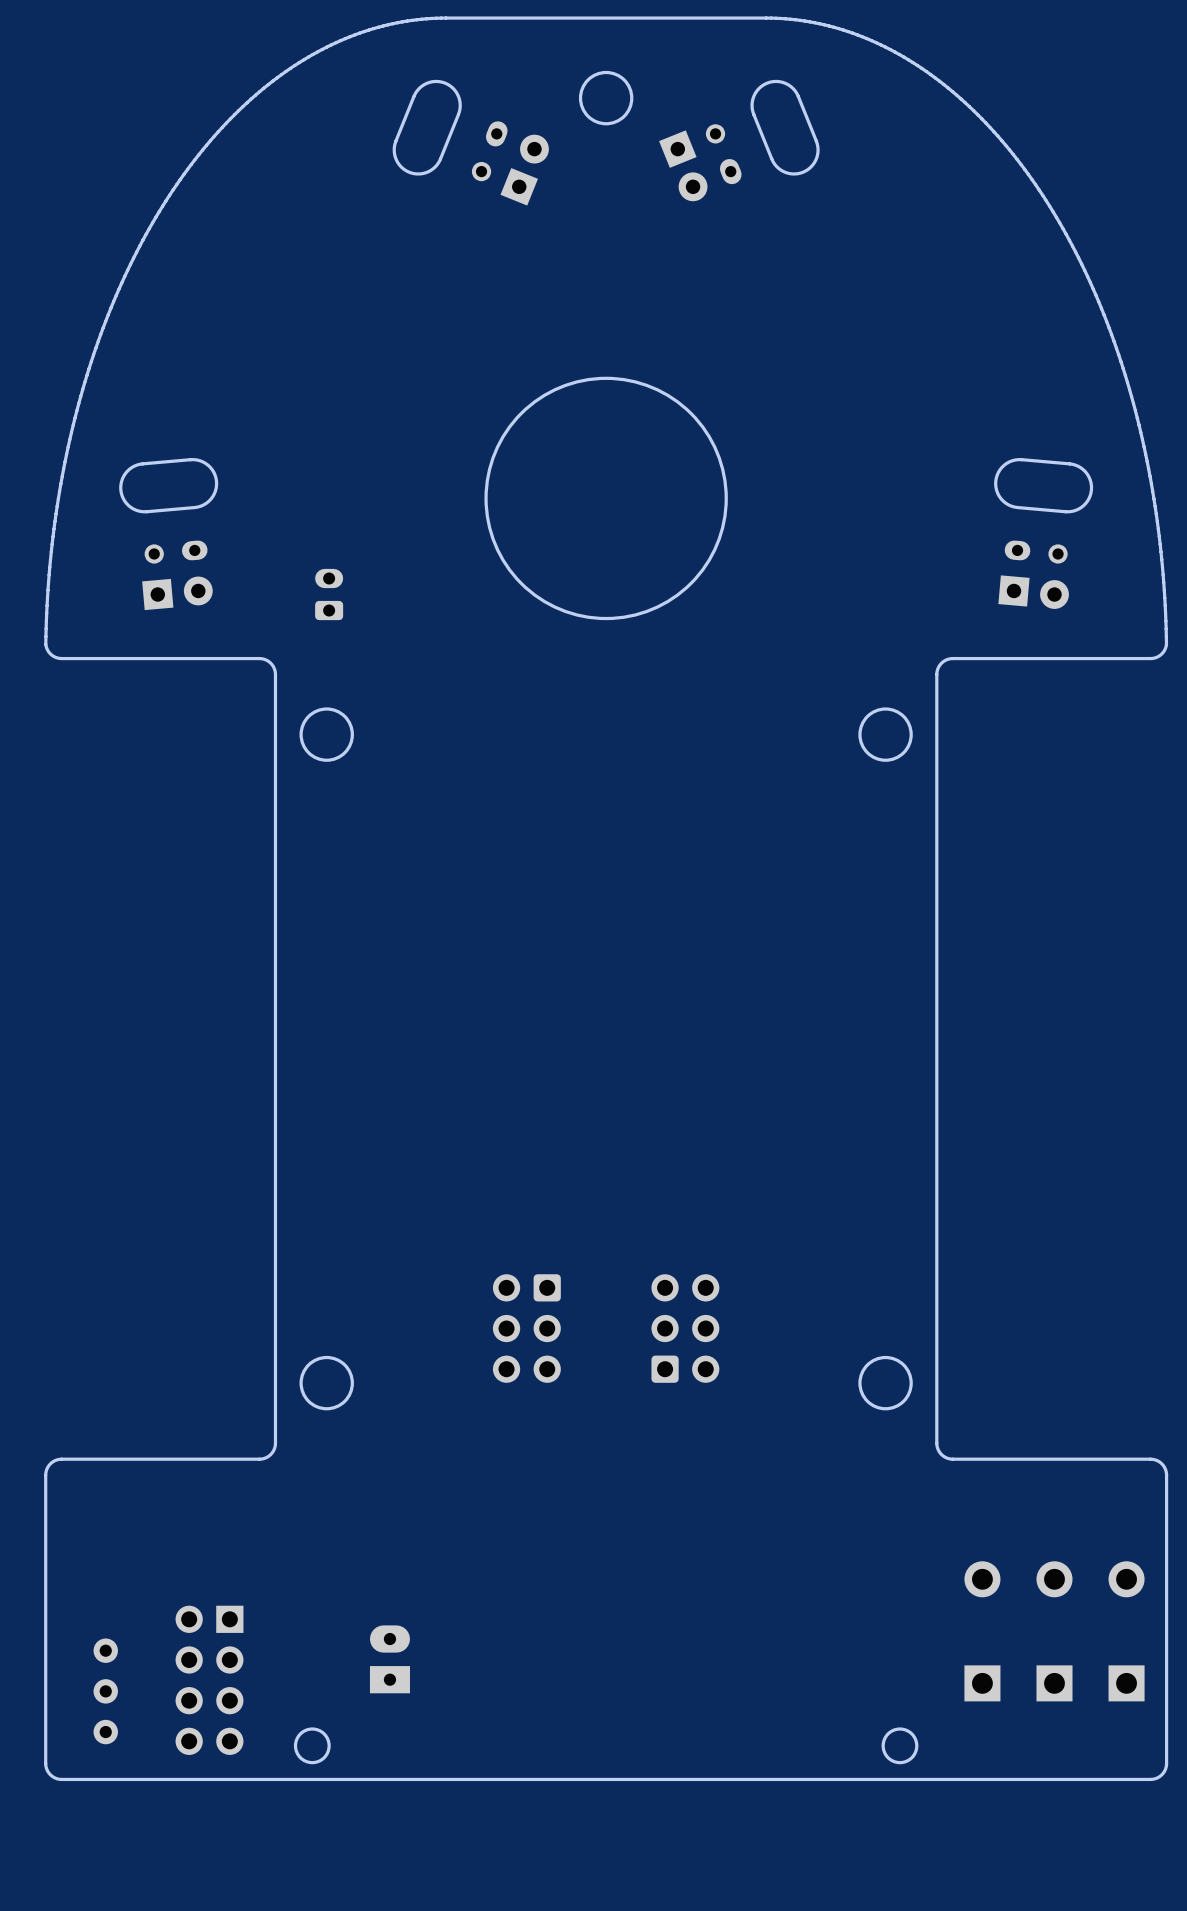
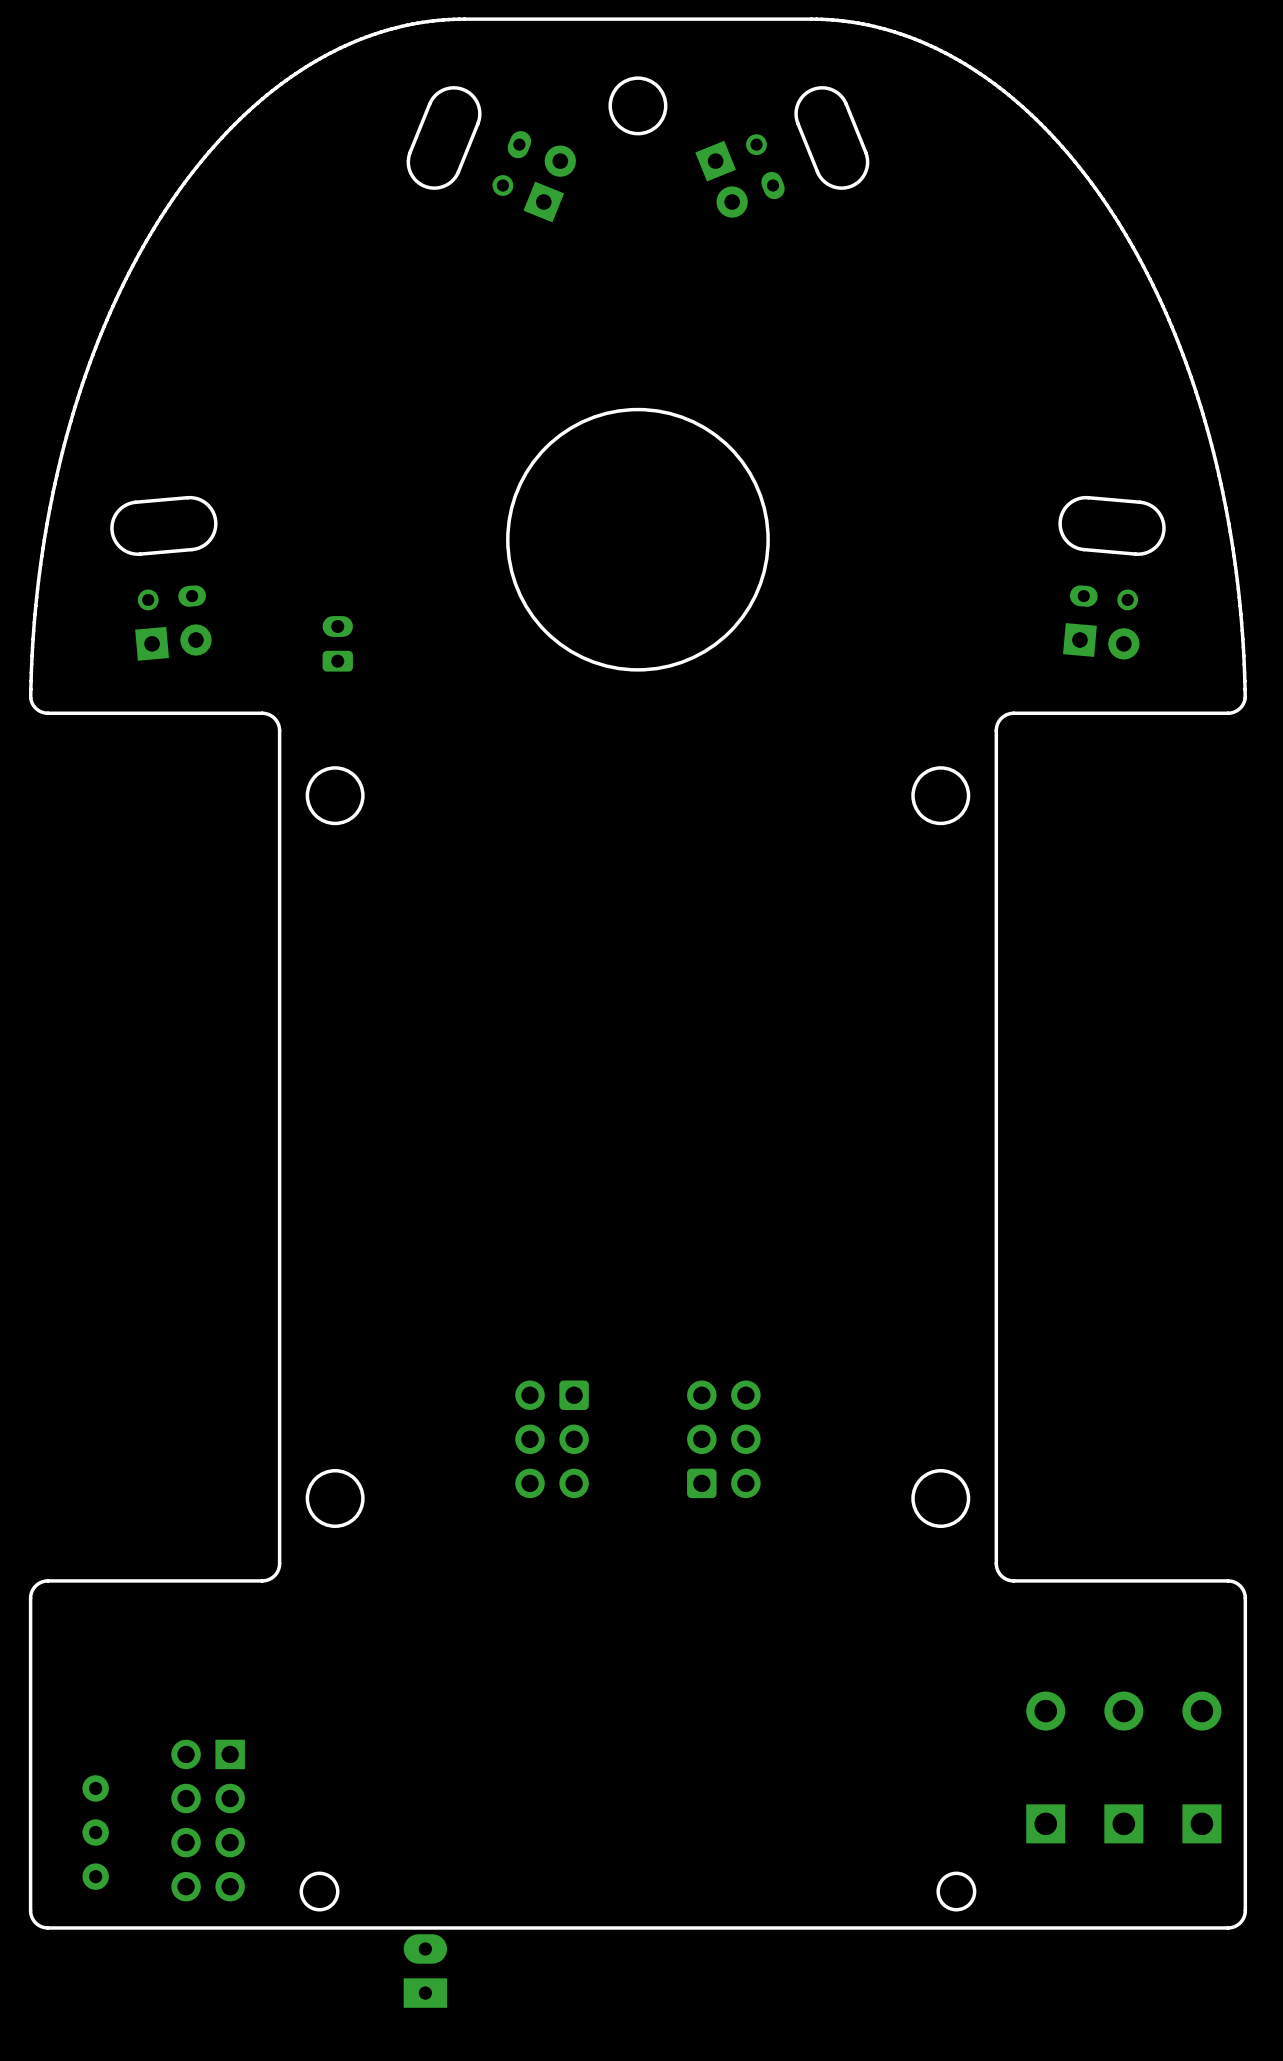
part position: (389, 1659) -> (425, 1971)

